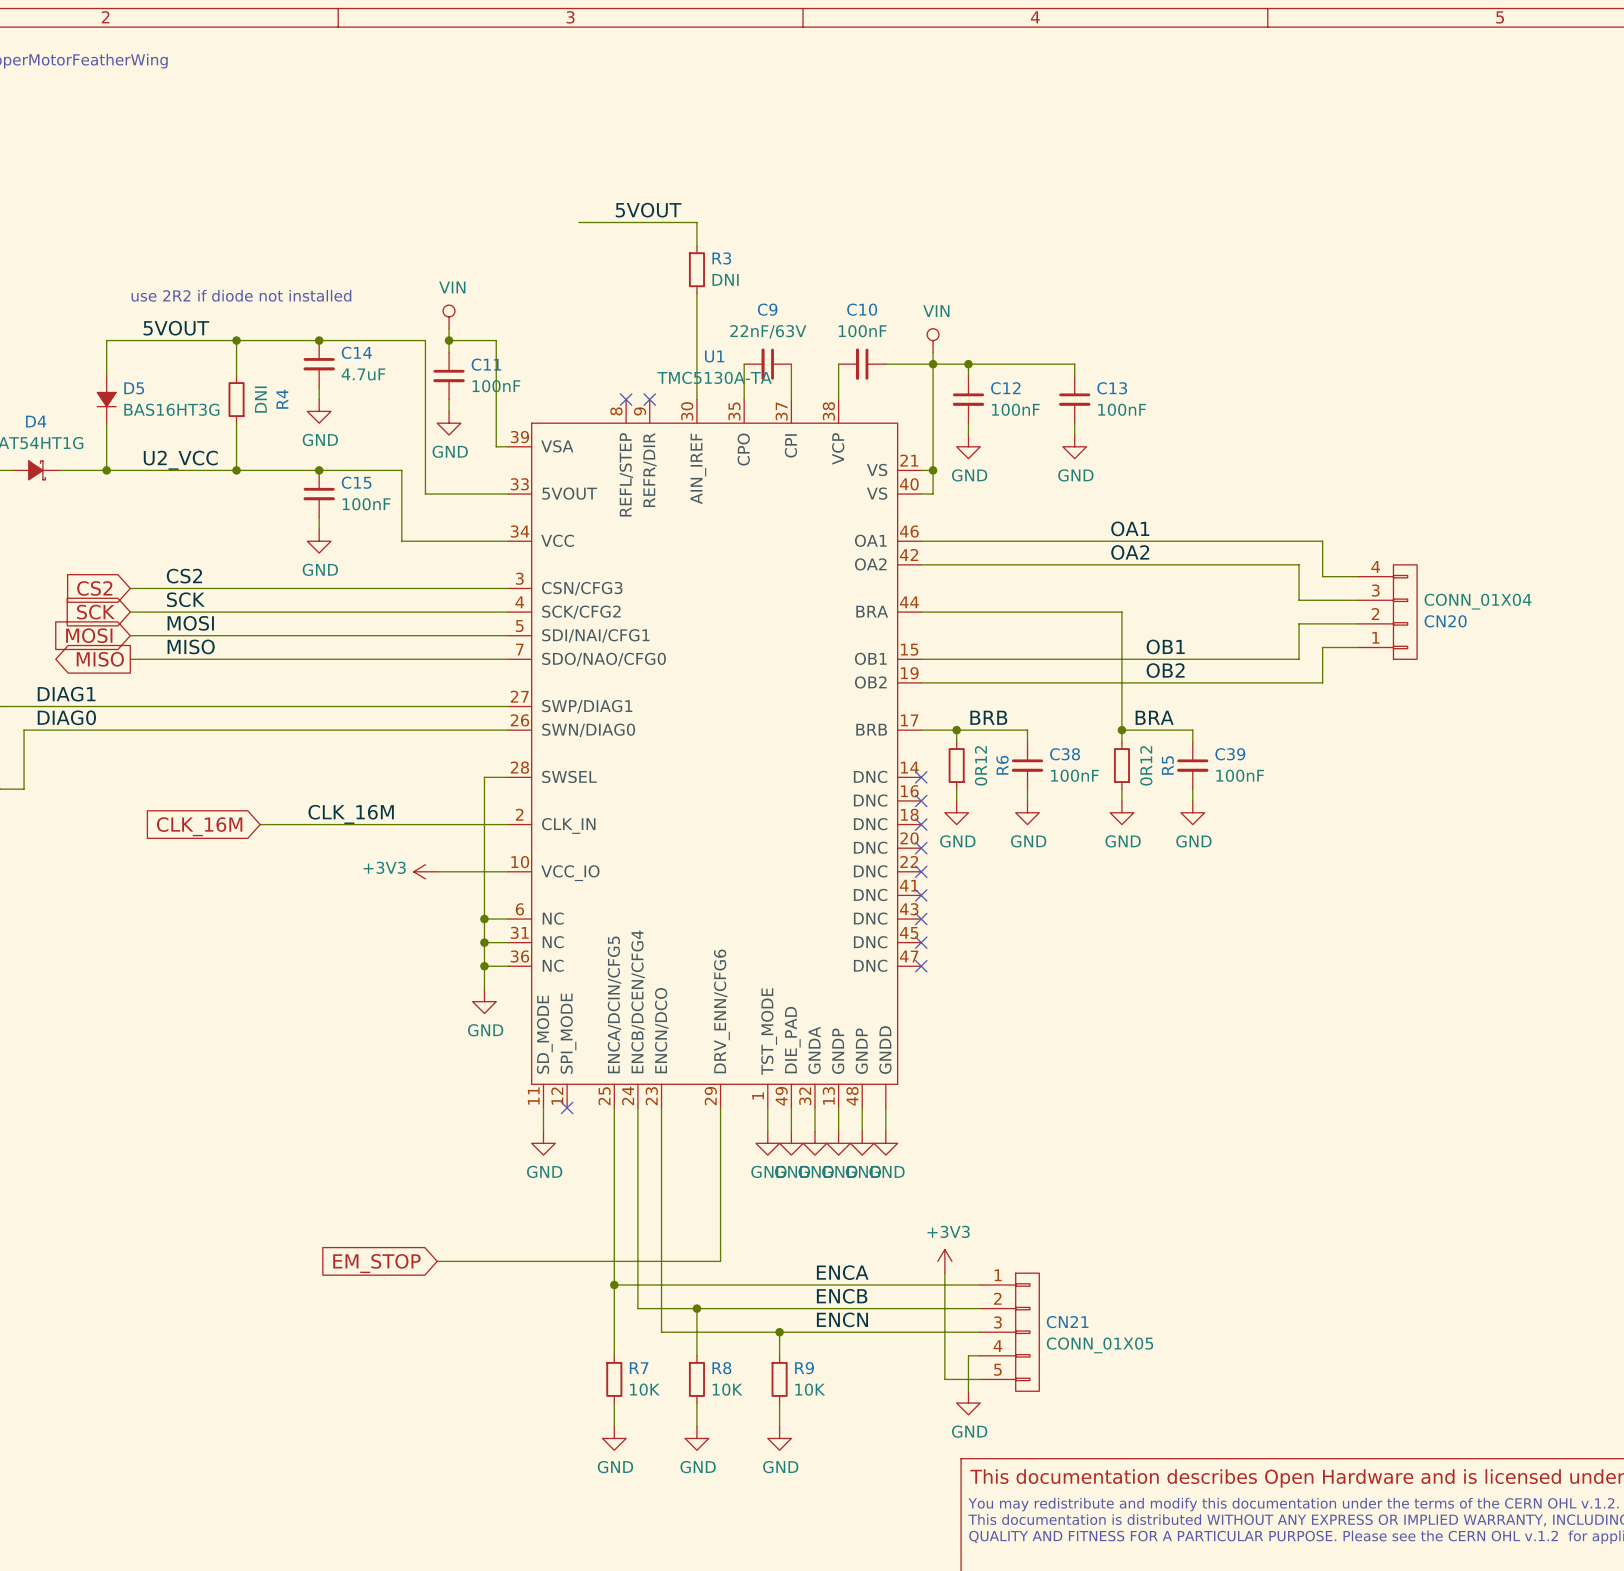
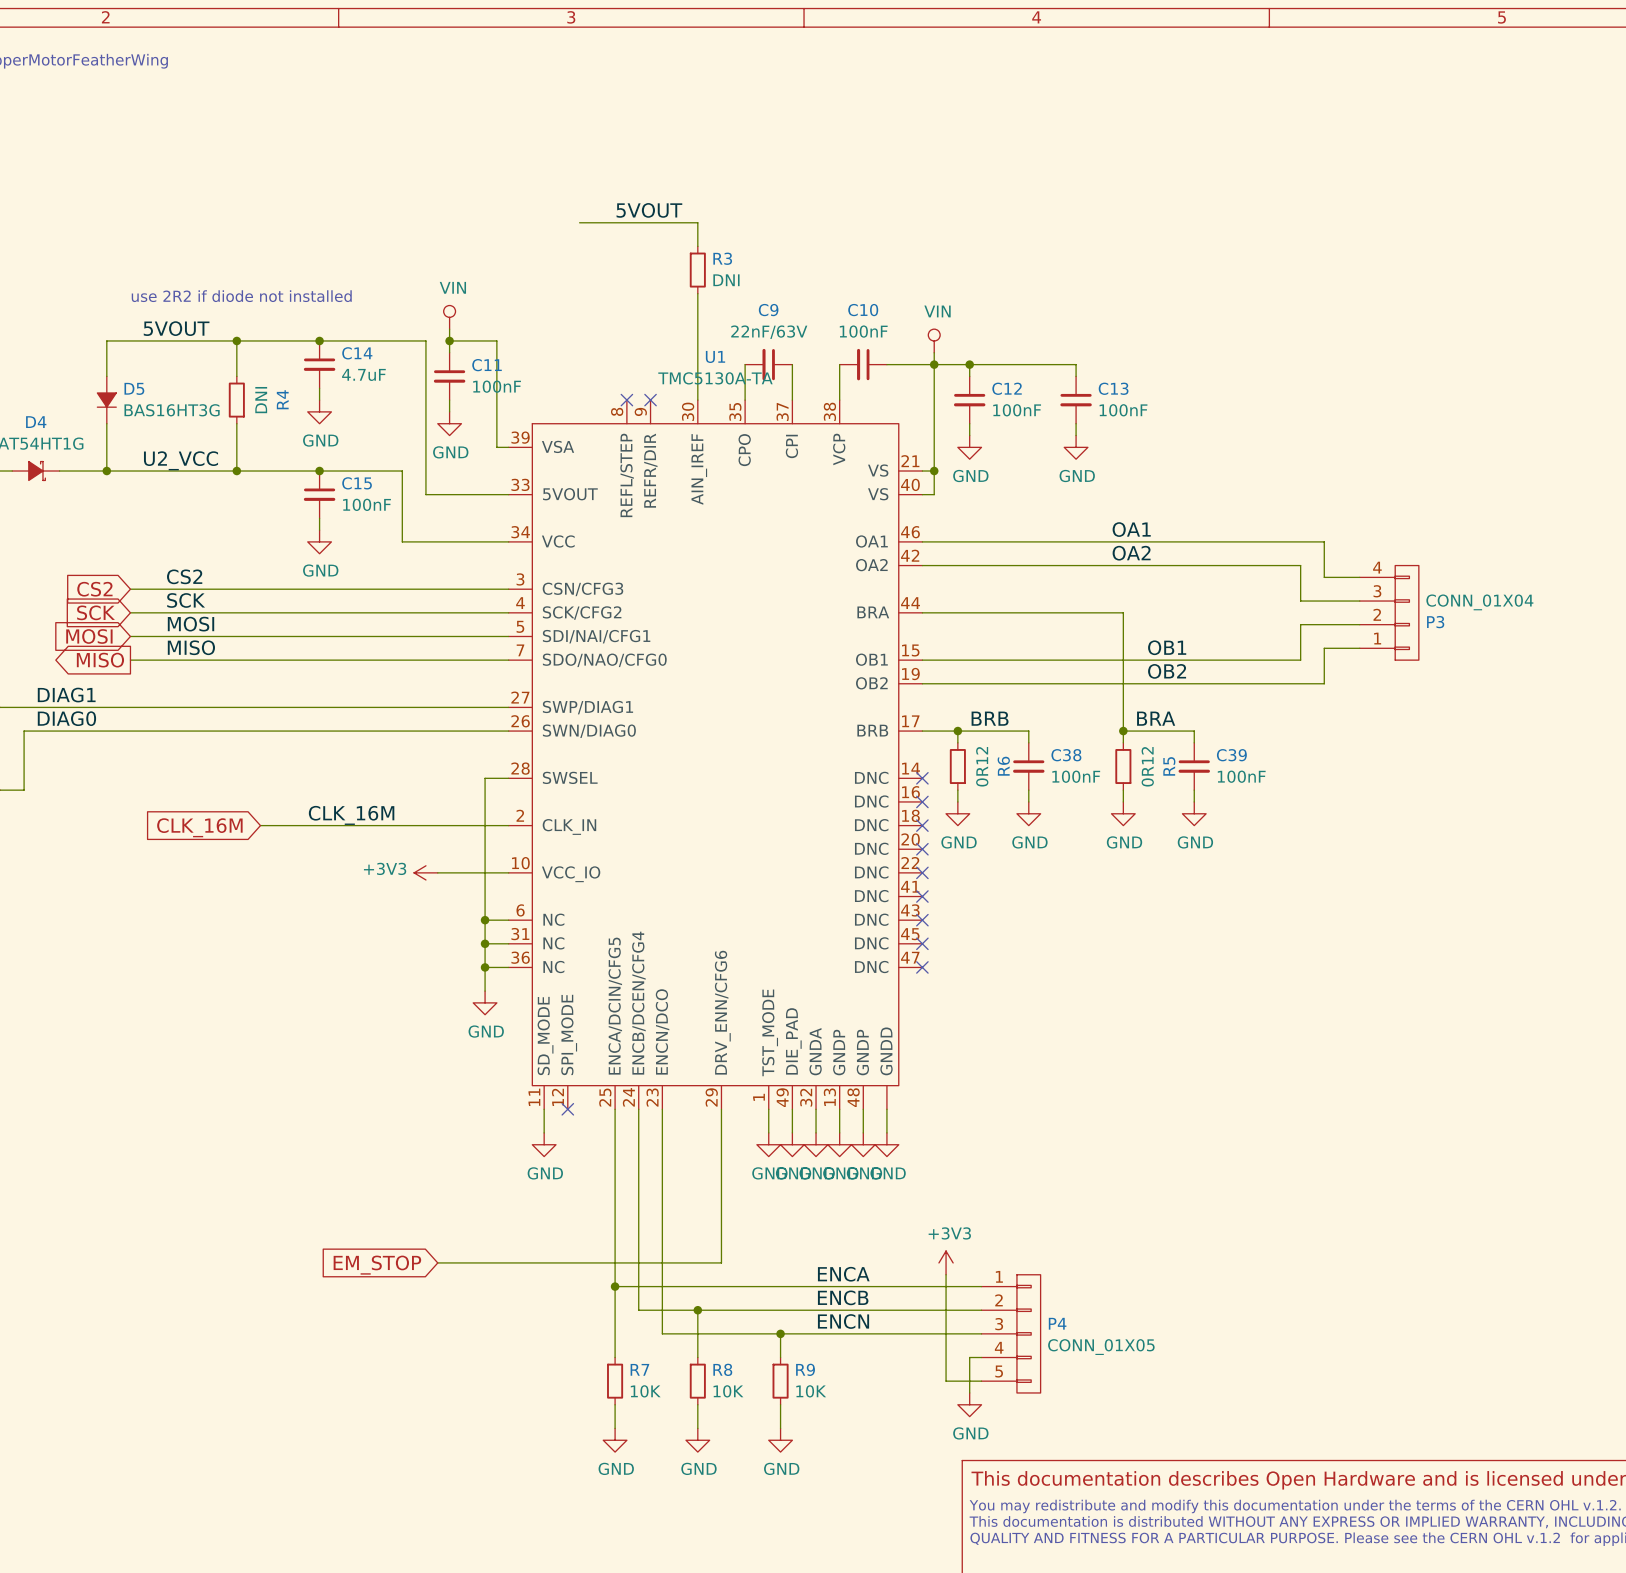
CN20 name: CN20 (1445, 621) -> P3 (1435, 622)
CN21 name: CN21 (1067, 1322) -> P4 (1057, 1323)

